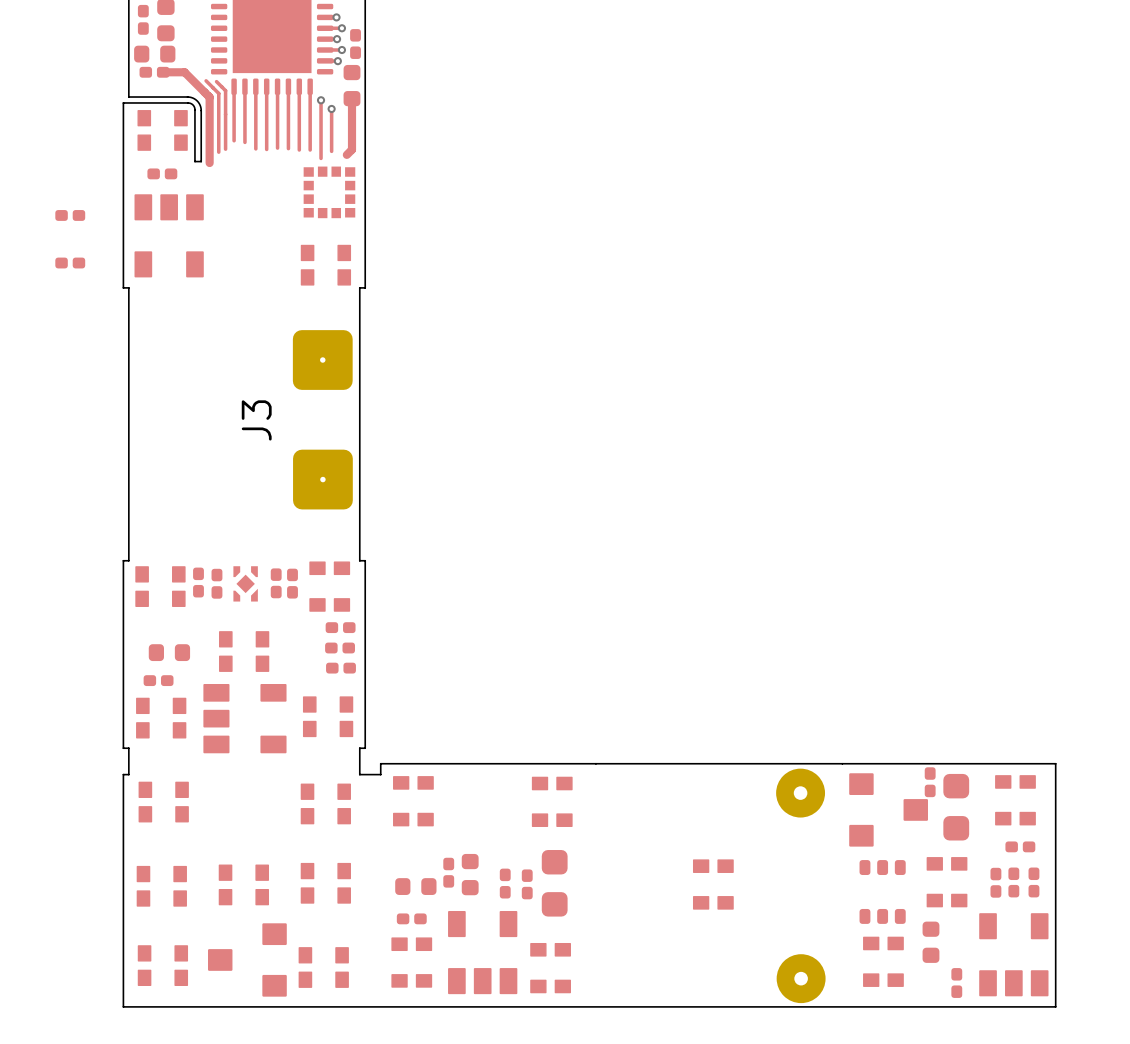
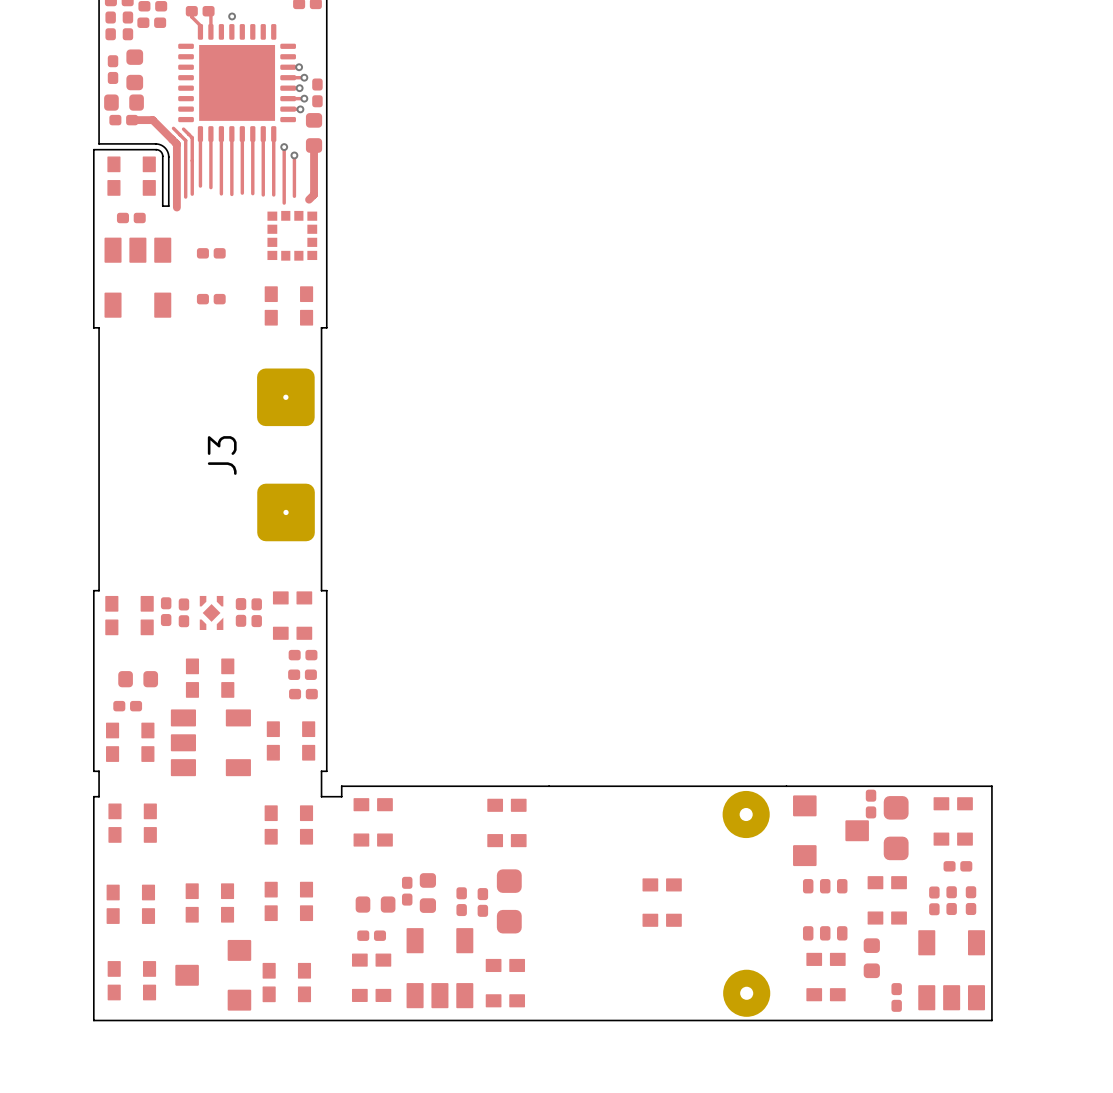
part: none -> (211, 253)
part: (70, 215) -> none
part: none -> (211, 299)
part: (70, 263) -> none

